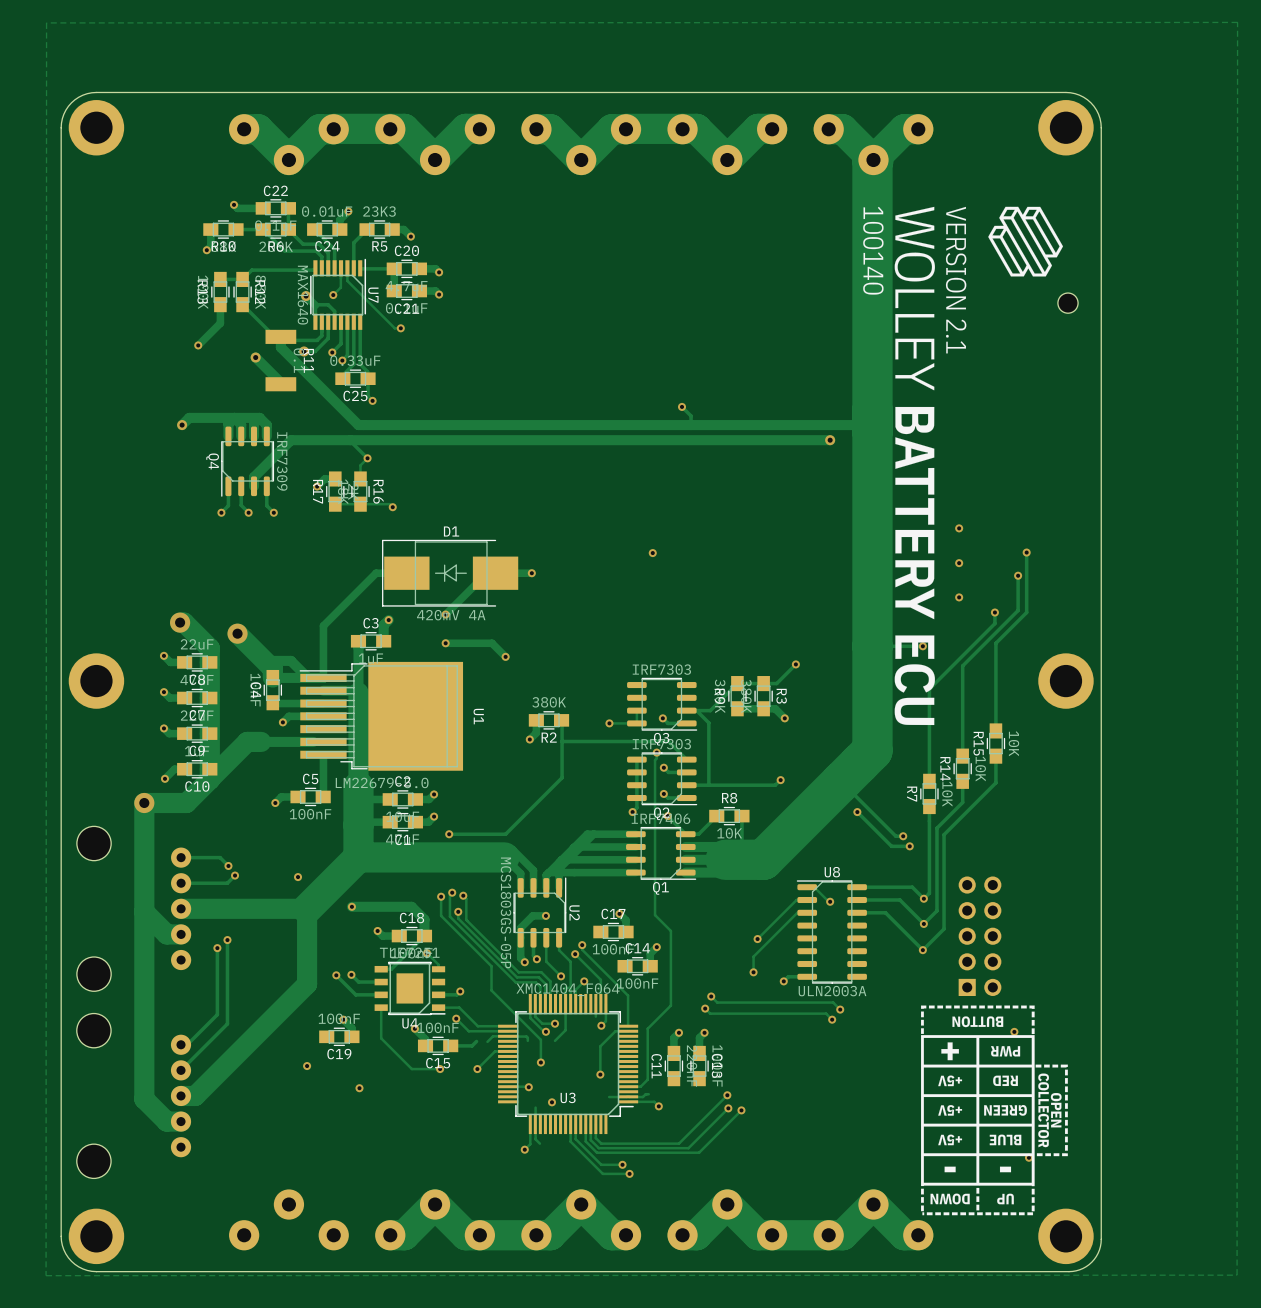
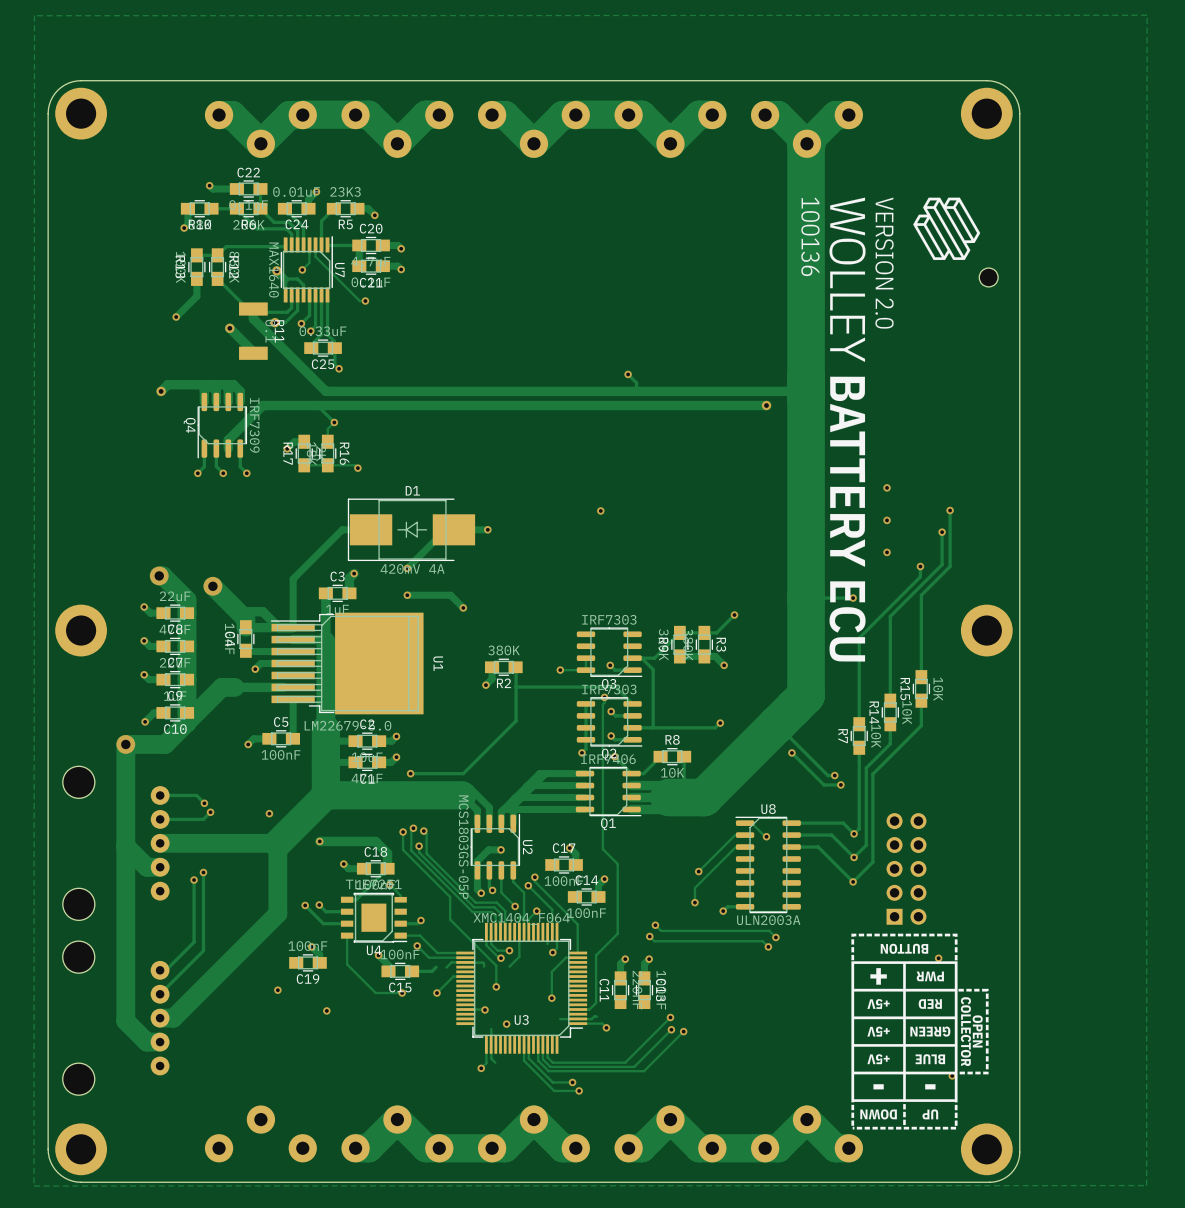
drawing shape: [863, 206, 1064, 726] -> [801, 197, 981, 662]

